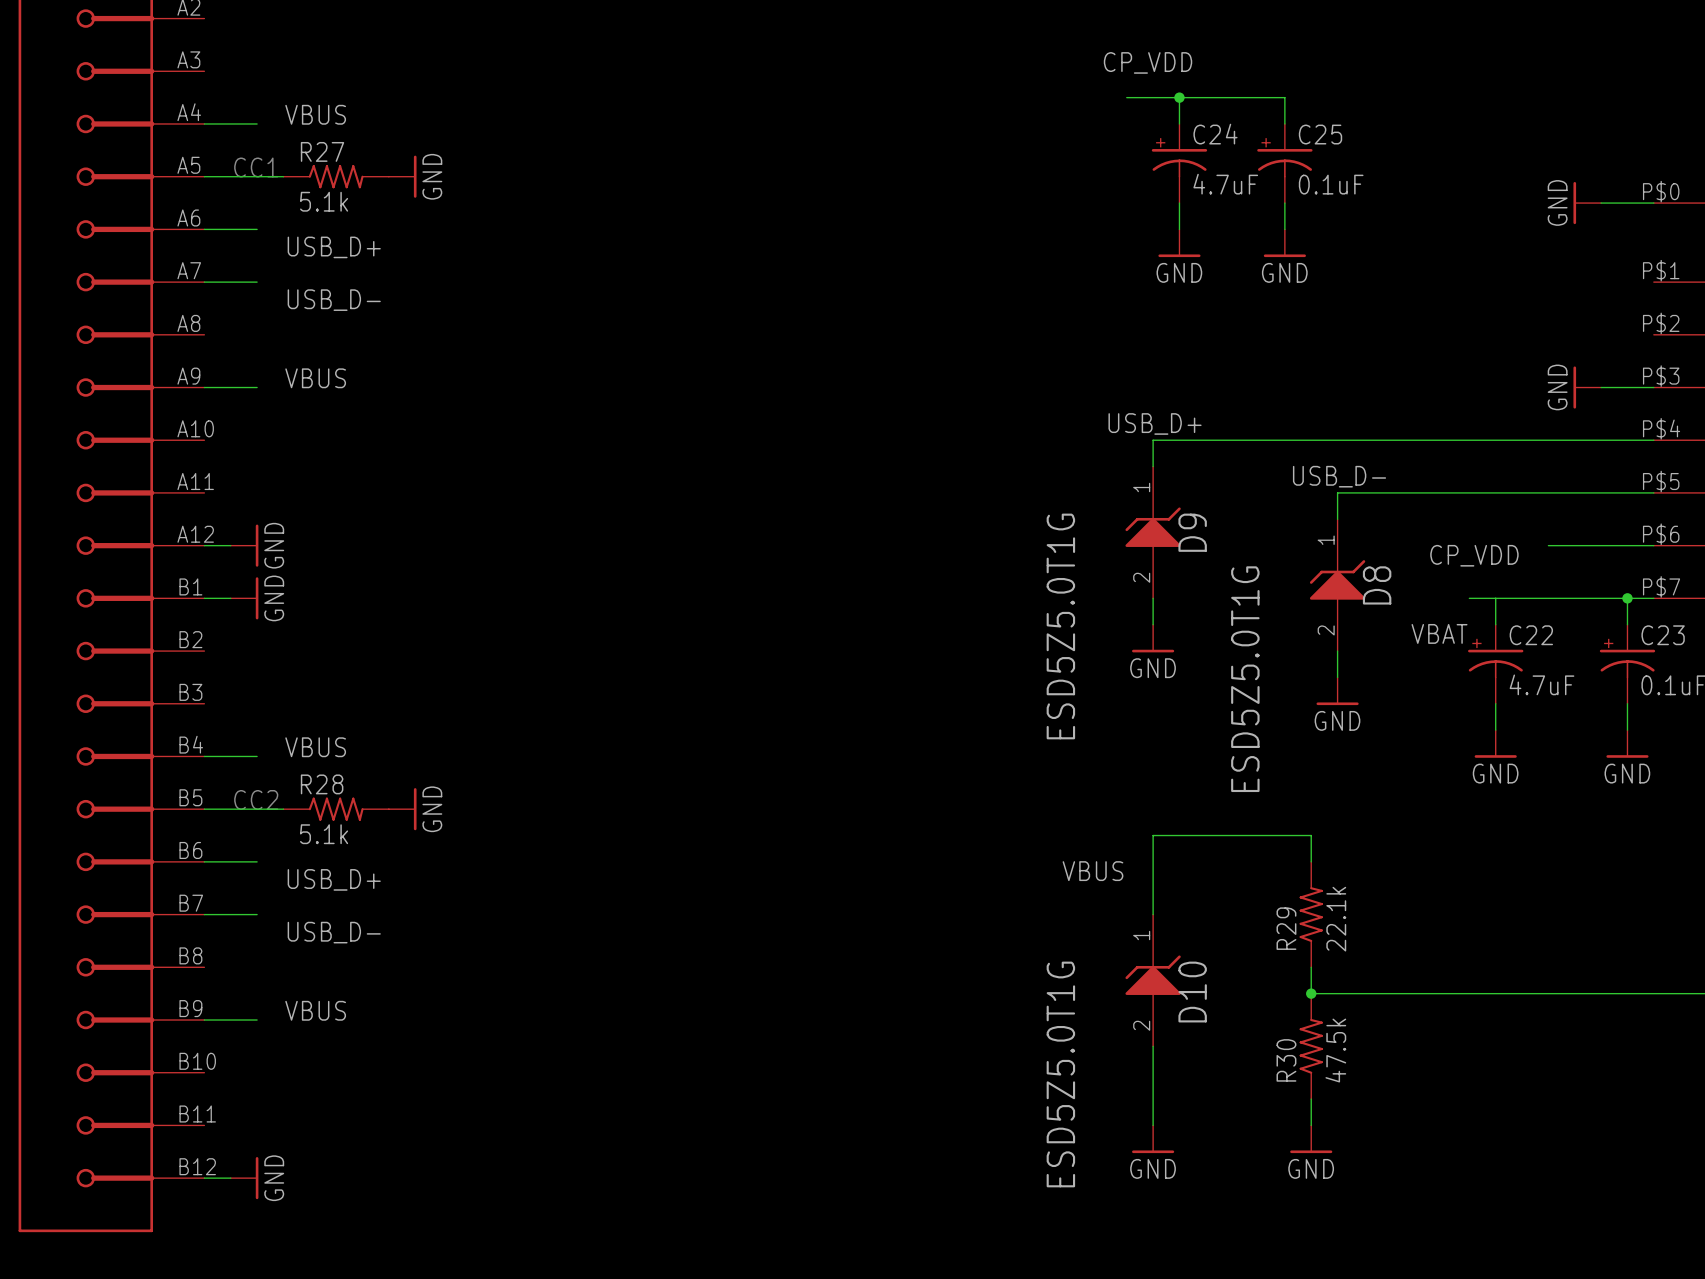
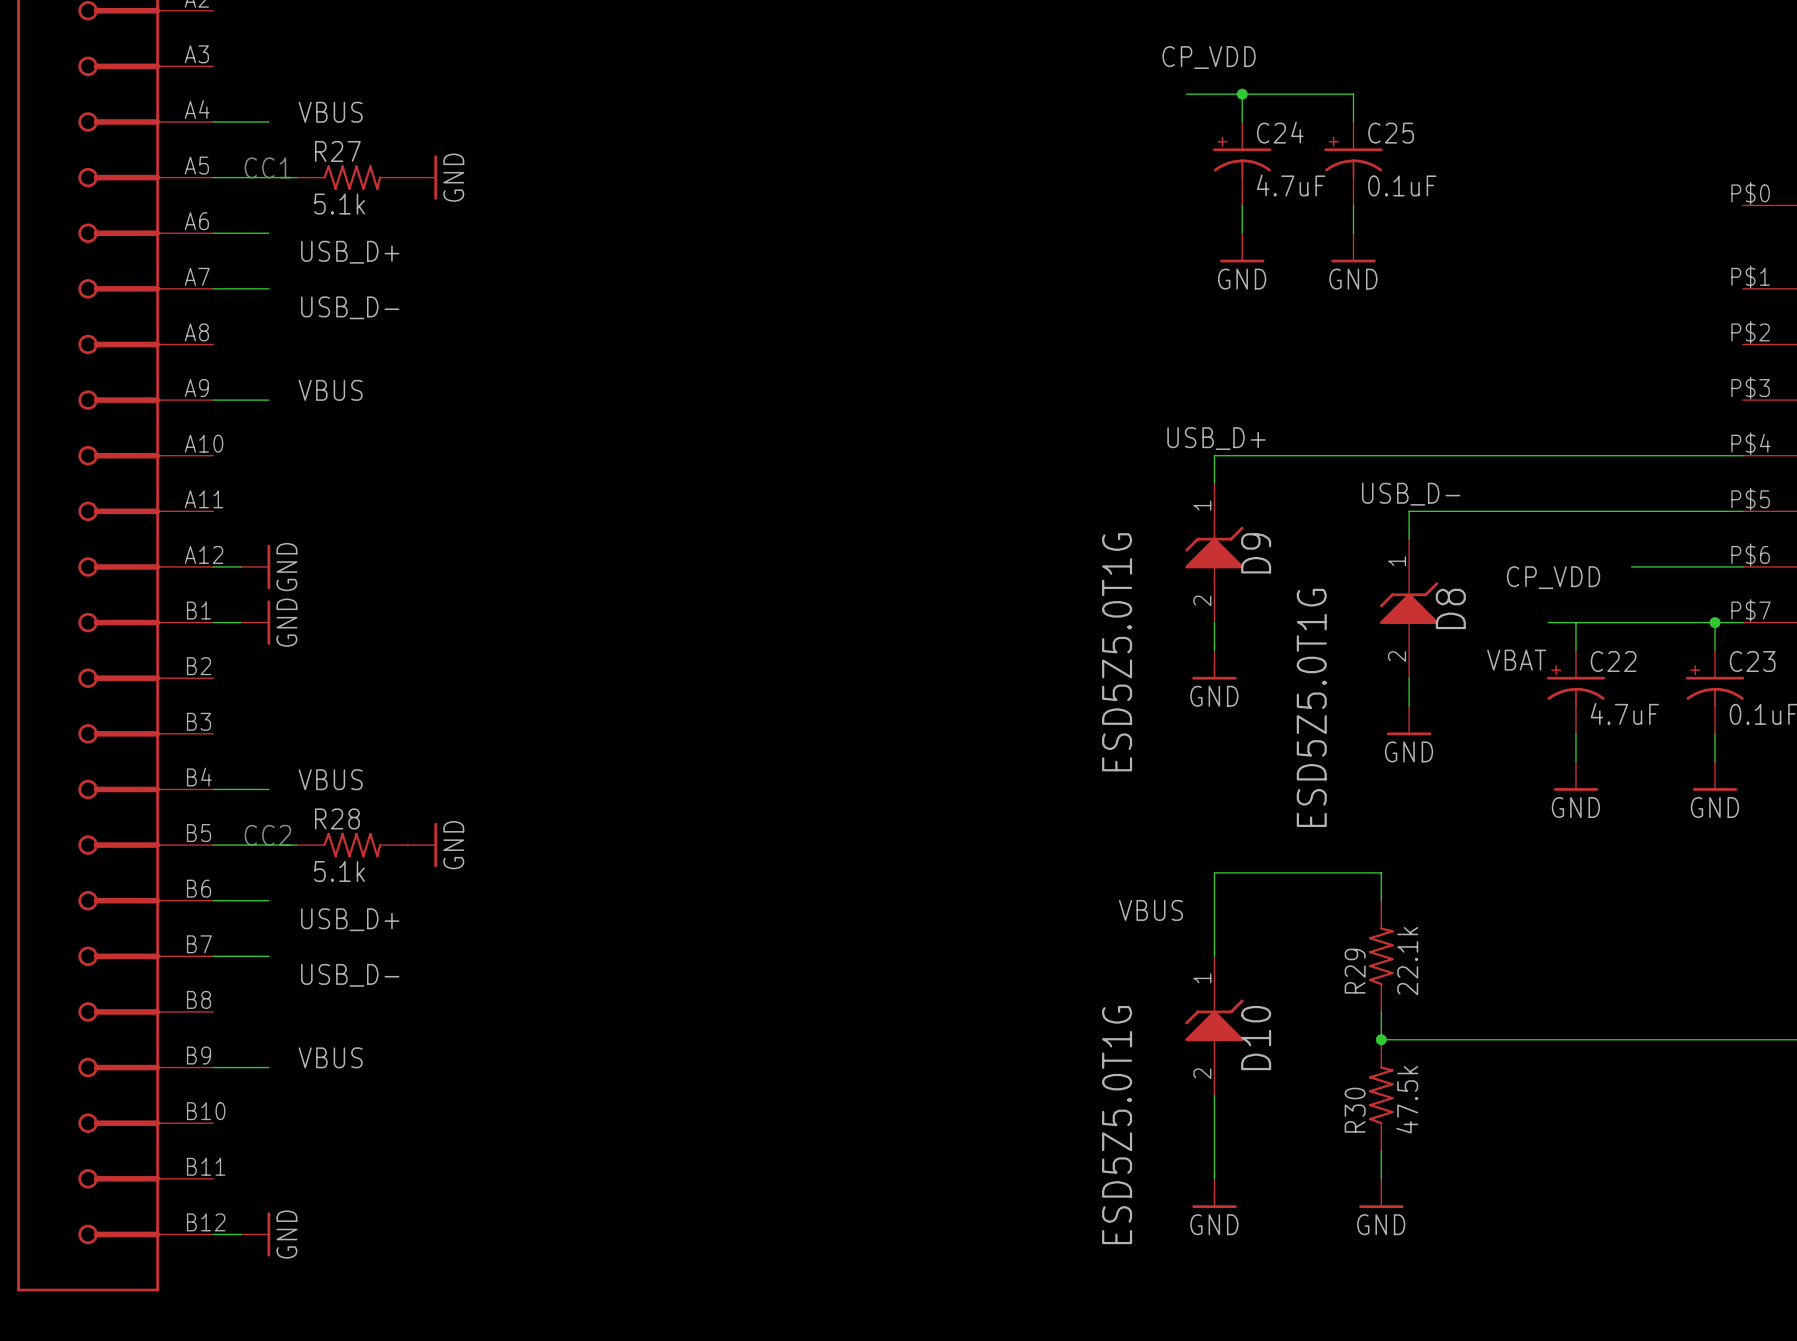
power symbol: GND (1587, 203) -> none
wire: (1601, 203) (1653, 203) -> none
power symbol: GND (1587, 387) -> none
wire: (1601, 387) (1653, 387) -> none

